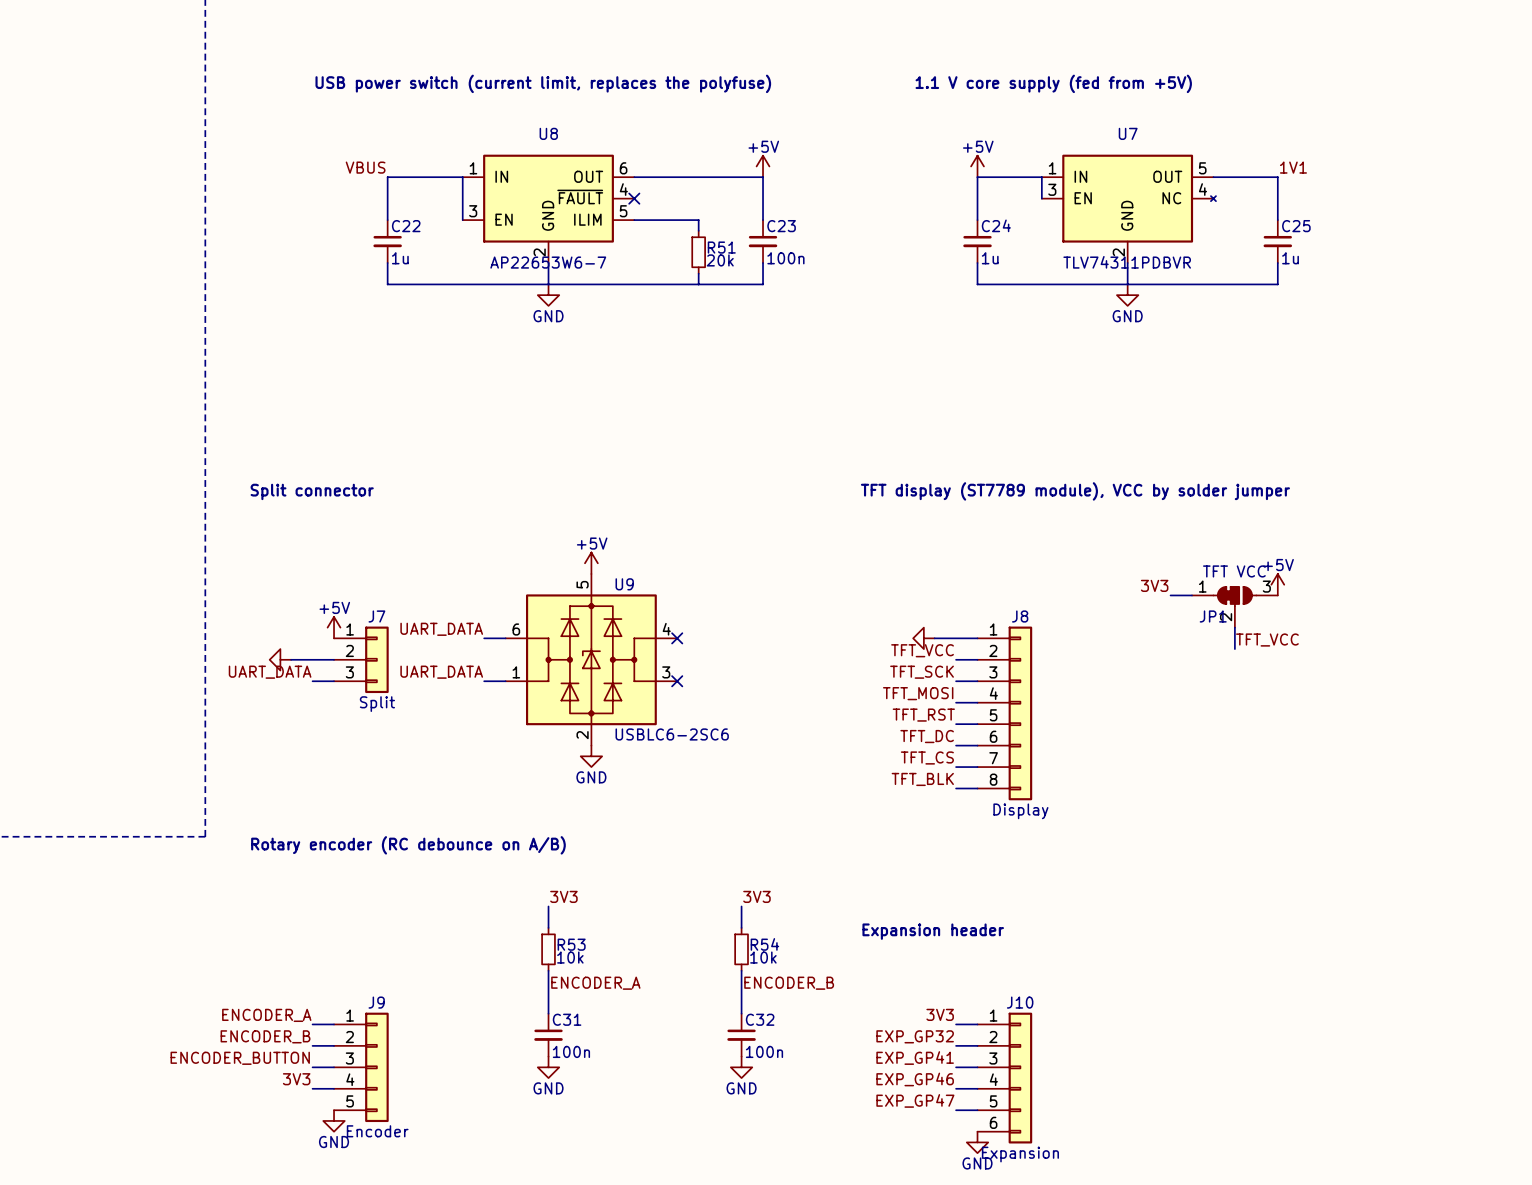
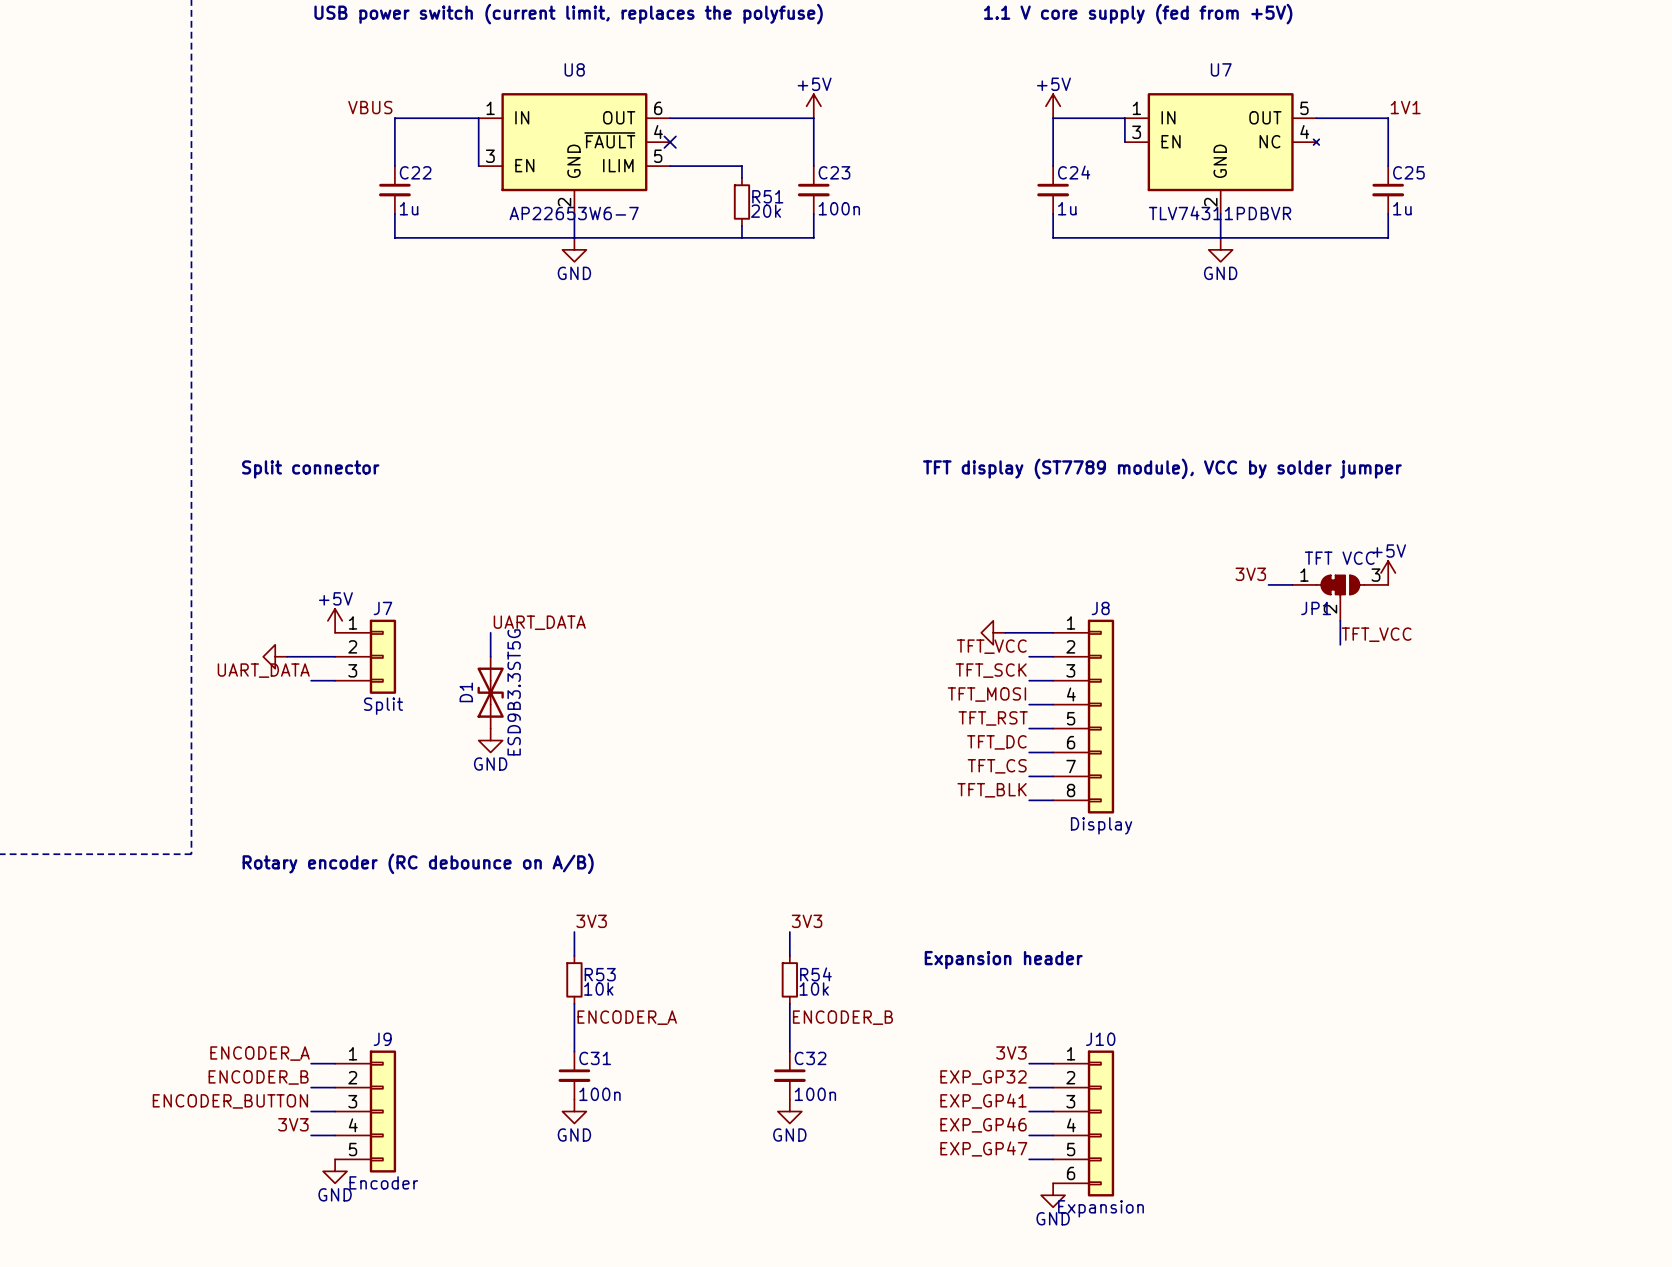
power symbol: +5V (591, 563) -> none
label position: UART_DATA (441, 629) -> UART_DATA (539, 622)
wire: none -> (490, 632) (490, 656)
wire: (484, 638) (505, 638) -> none
no-connect mark: (677, 638) -> none
U9: USBLC6-2SC6 (591, 659) -> none
label: UART_DATA (441, 672) -> none
wire: (484, 681) (505, 681) -> none
no-connect mark: (677, 681) -> none
D1: none -> ESD9B3.3ST5G (490, 692)
power symbol position: GND (591, 756) -> GND (490, 740)

